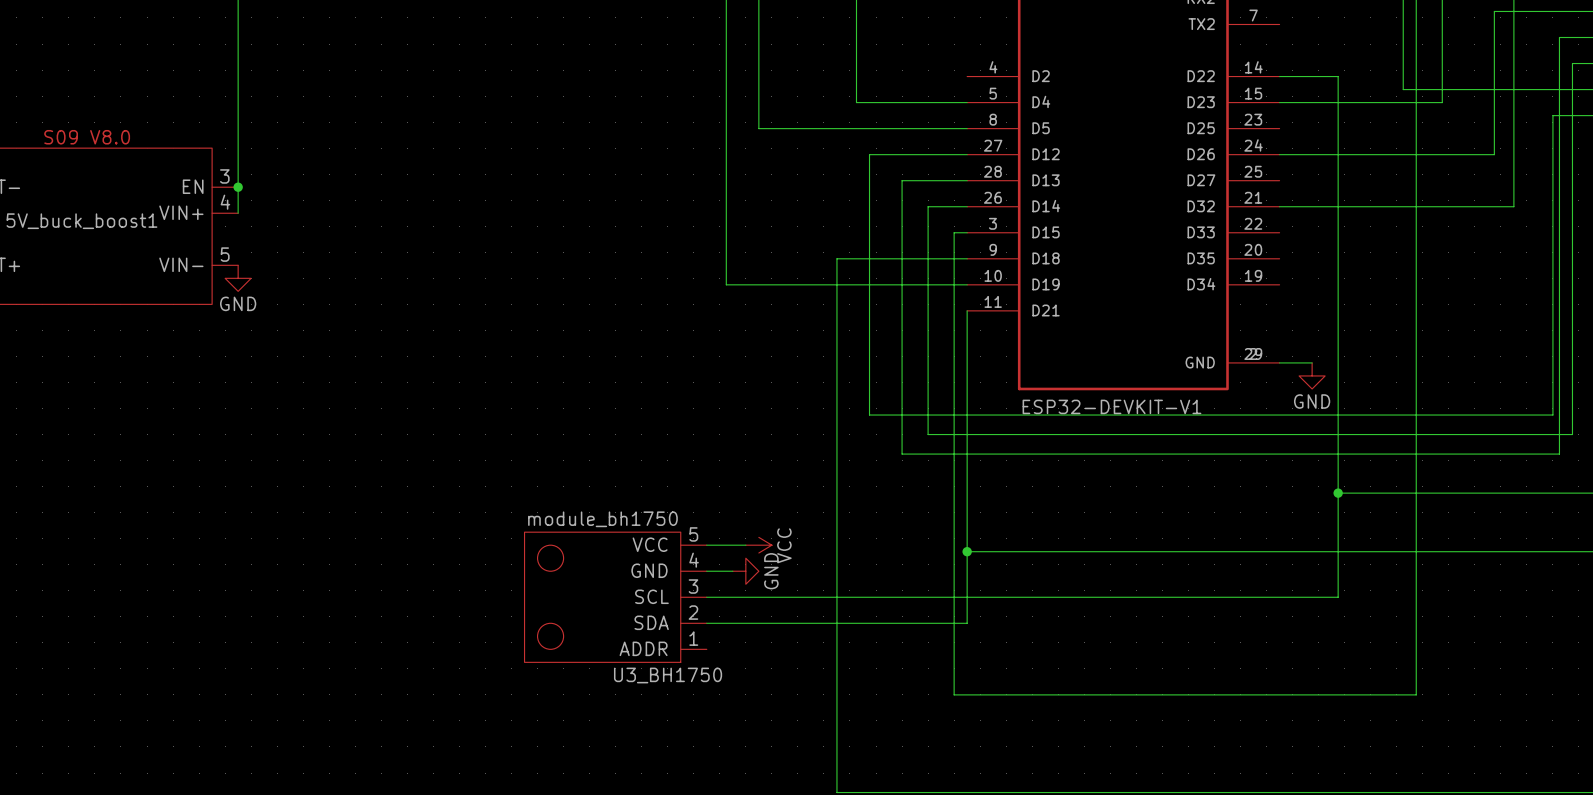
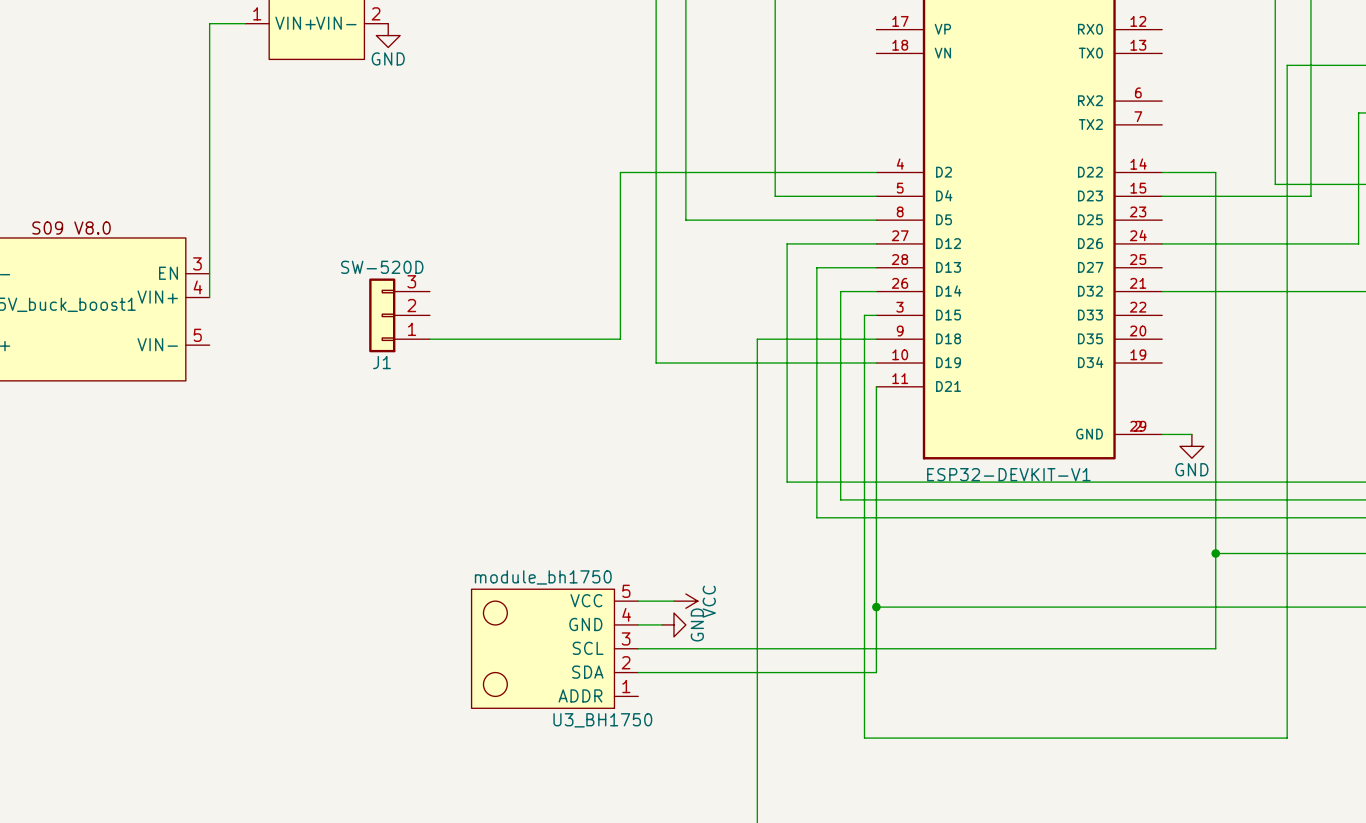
wire: none -> (876, 172) (620, 172) (620, 339) (429, 339)
junction: (238, 187) -> none
J1: none -> SW-520D (399, 315)
power symbol: GND (238, 278) -> none

